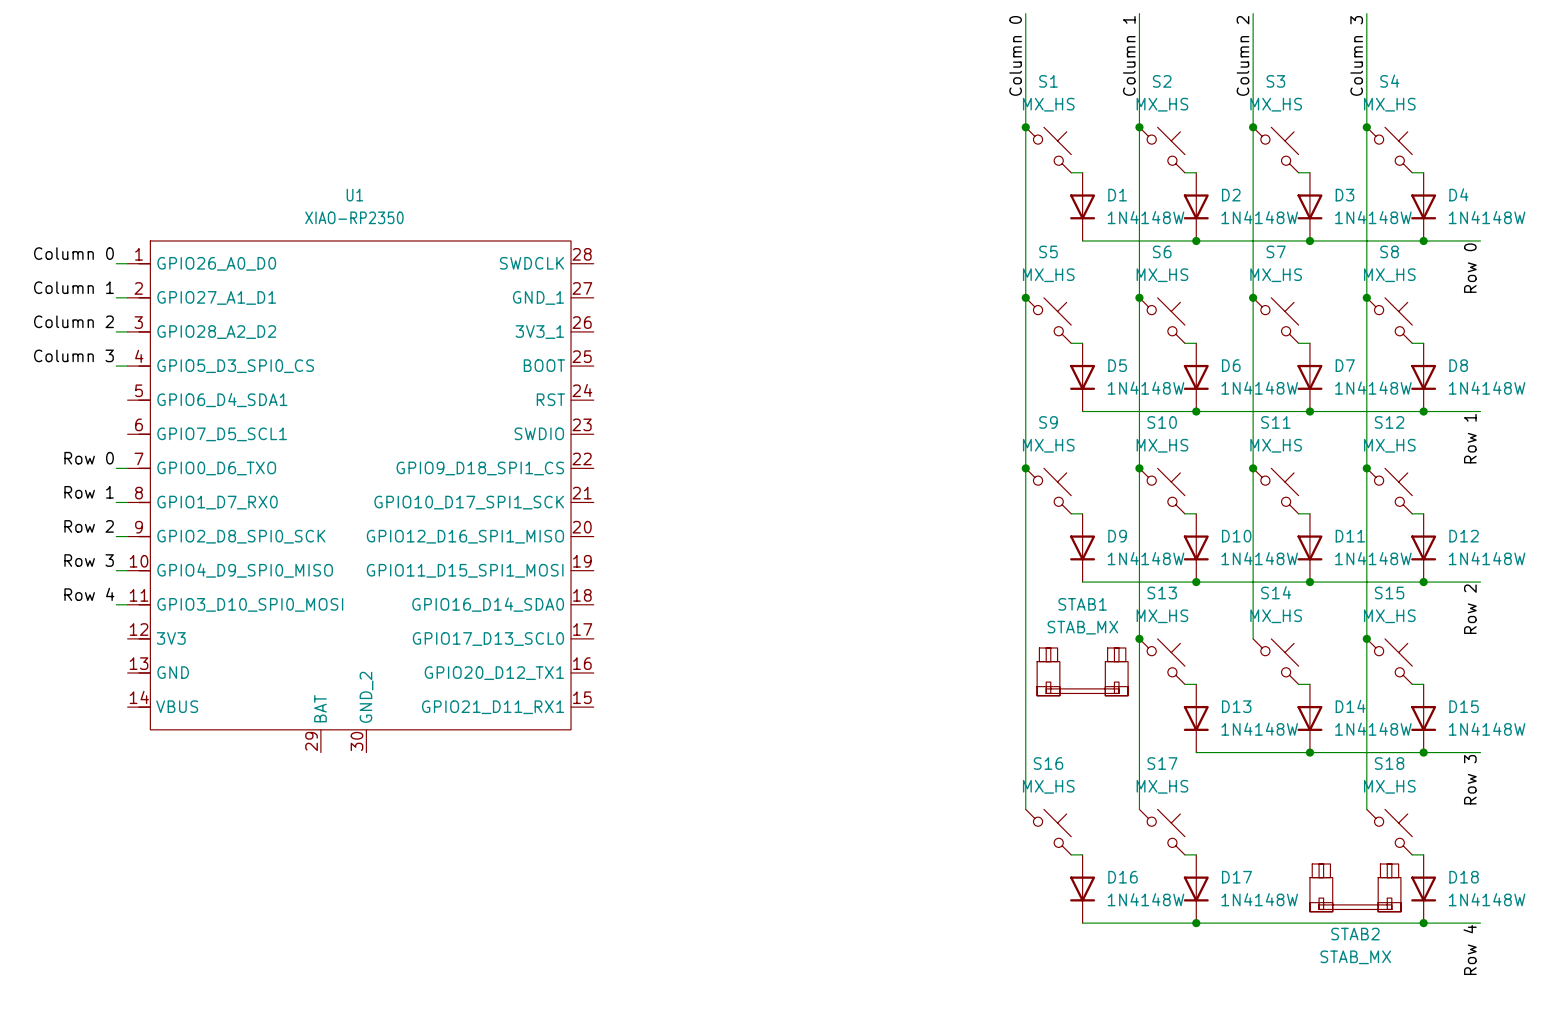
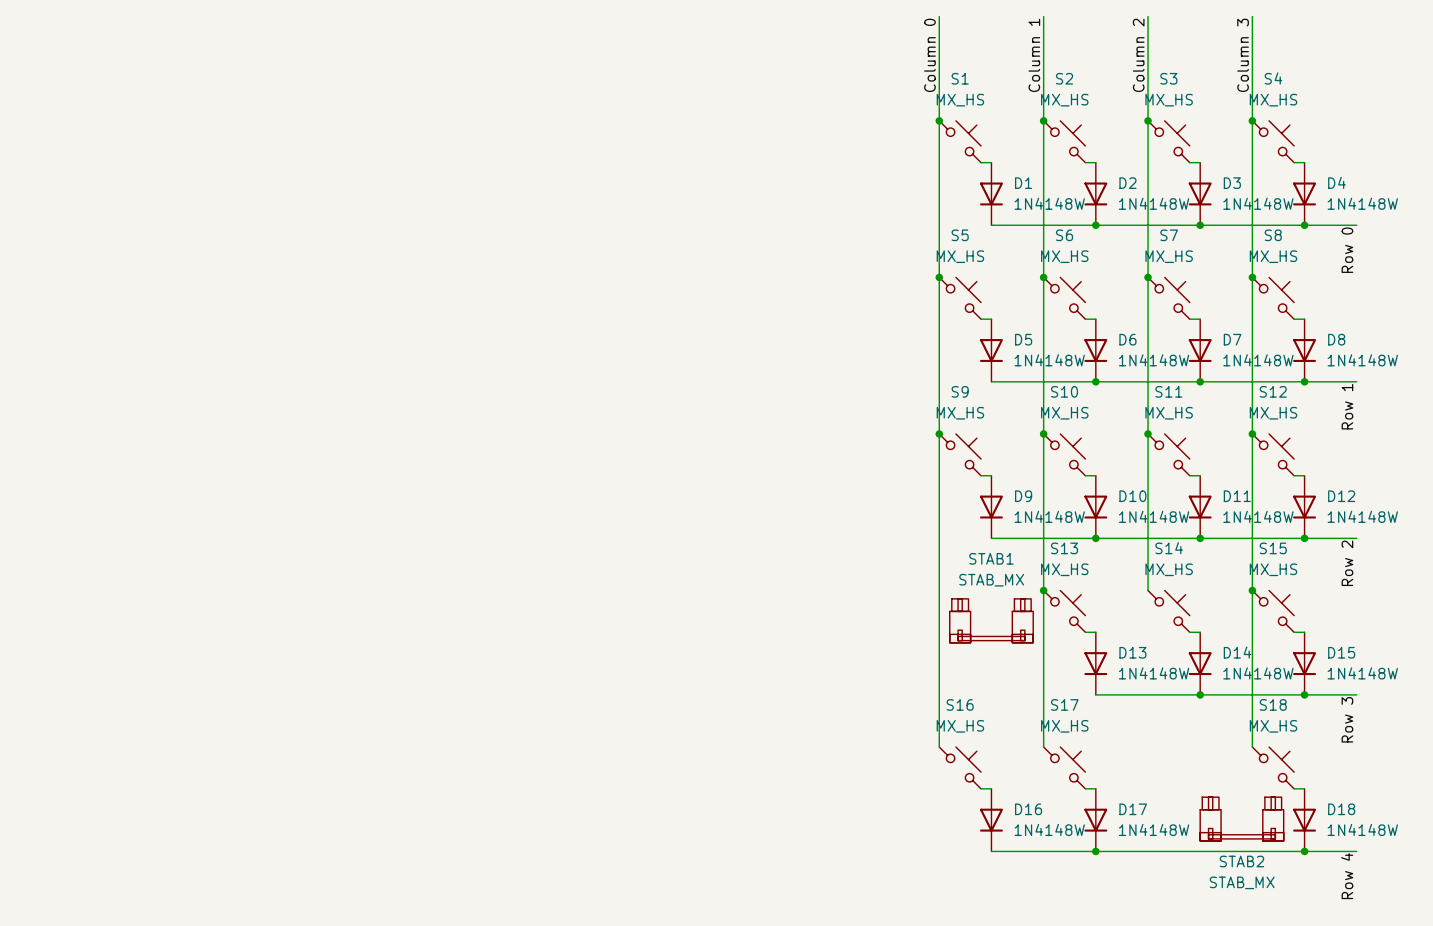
label: Column 0 (73, 253) -> none
wire: (116, 263) (127, 263) -> none
label: Column 1 (73, 287) -> none
wire: (116, 297) (127, 297) -> none
label: Column 2 (73, 321) -> none
wire: (116, 331) (127, 331) -> none
label: Column 3 (73, 355) -> none
wire: (116, 366) (127, 366) -> none
label: Row 0 (89, 458) -> none
wire: (116, 468) (127, 468) -> none
label: Row 1 (89, 492) -> none
U1: XIAO-RP2350 (360, 496) -> none
wire: (116, 502) (127, 502) -> none
label: Row 2 (89, 526) -> none
wire: (116, 536) (127, 536) -> none
label: Row 3 (89, 560) -> none
wire: (116, 570) (127, 570) -> none
label: Row 4 (89, 594) -> none
wire: (116, 604) (127, 604) -> none

